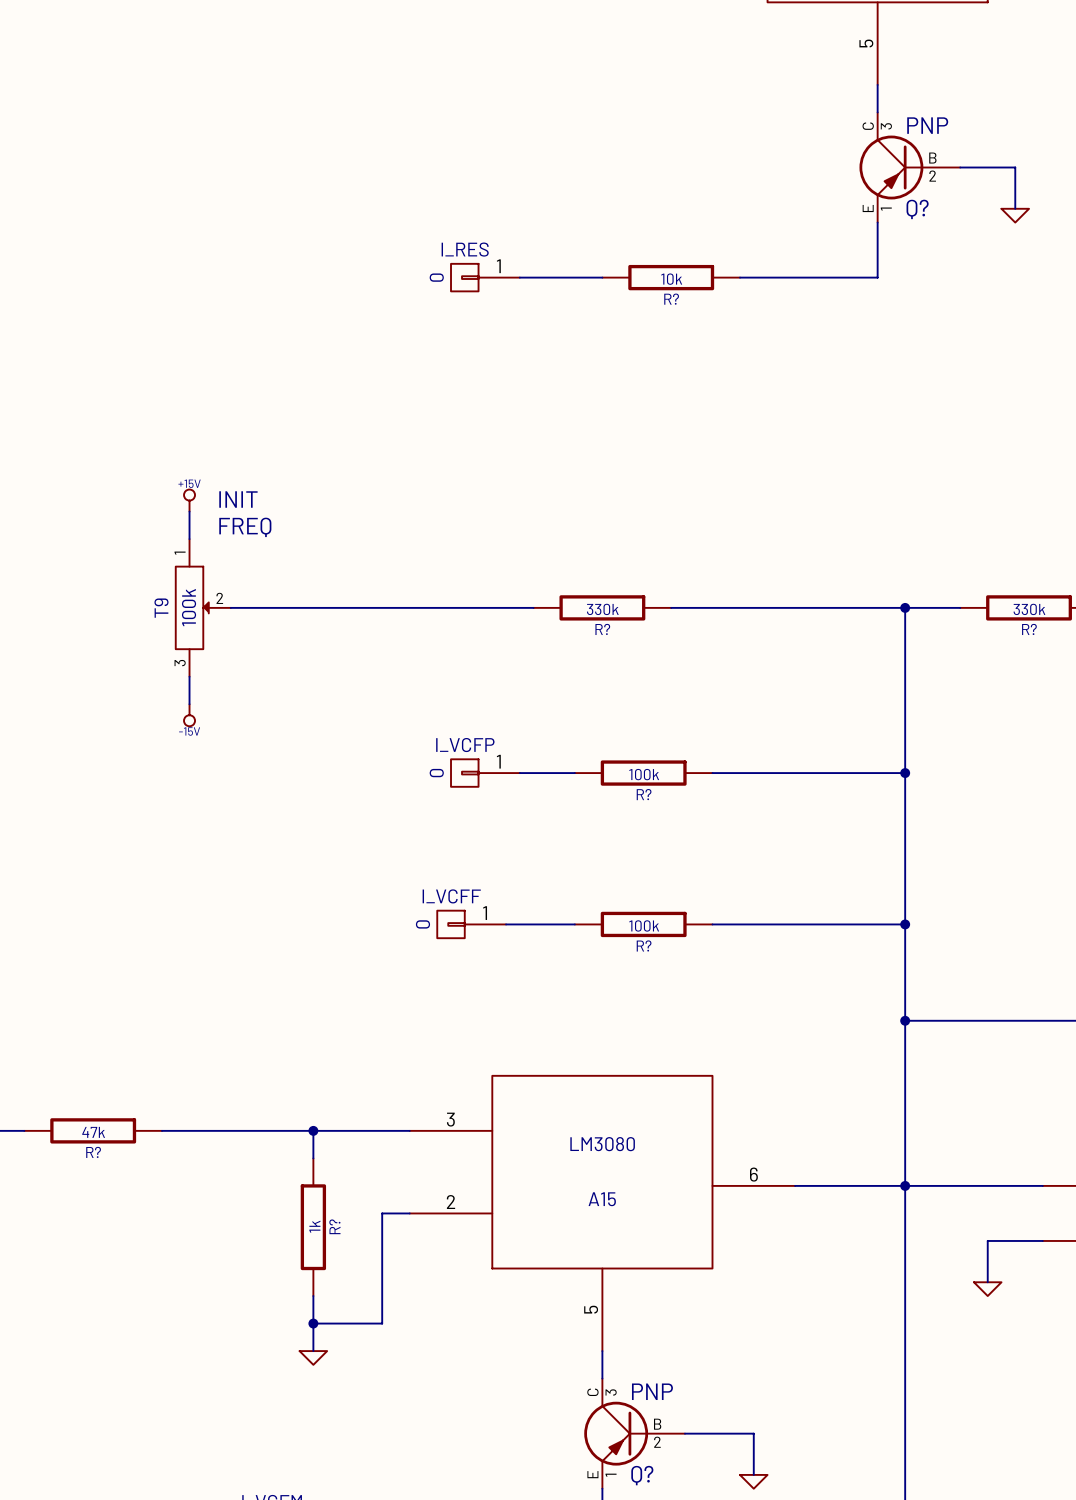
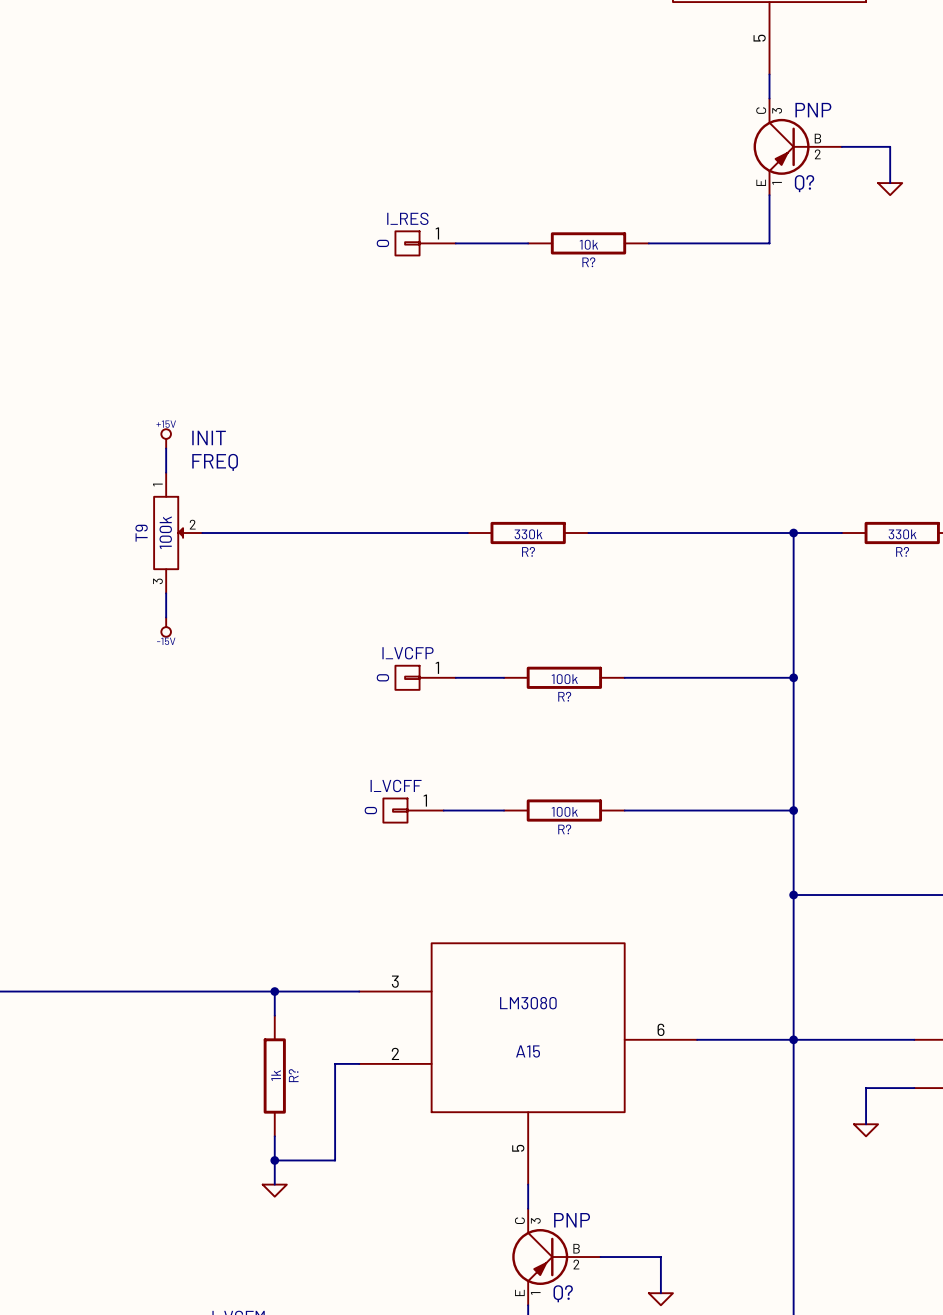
wire: none -> (21, 991) (142, 991)
R?: 47k (93, 1130) -> none

